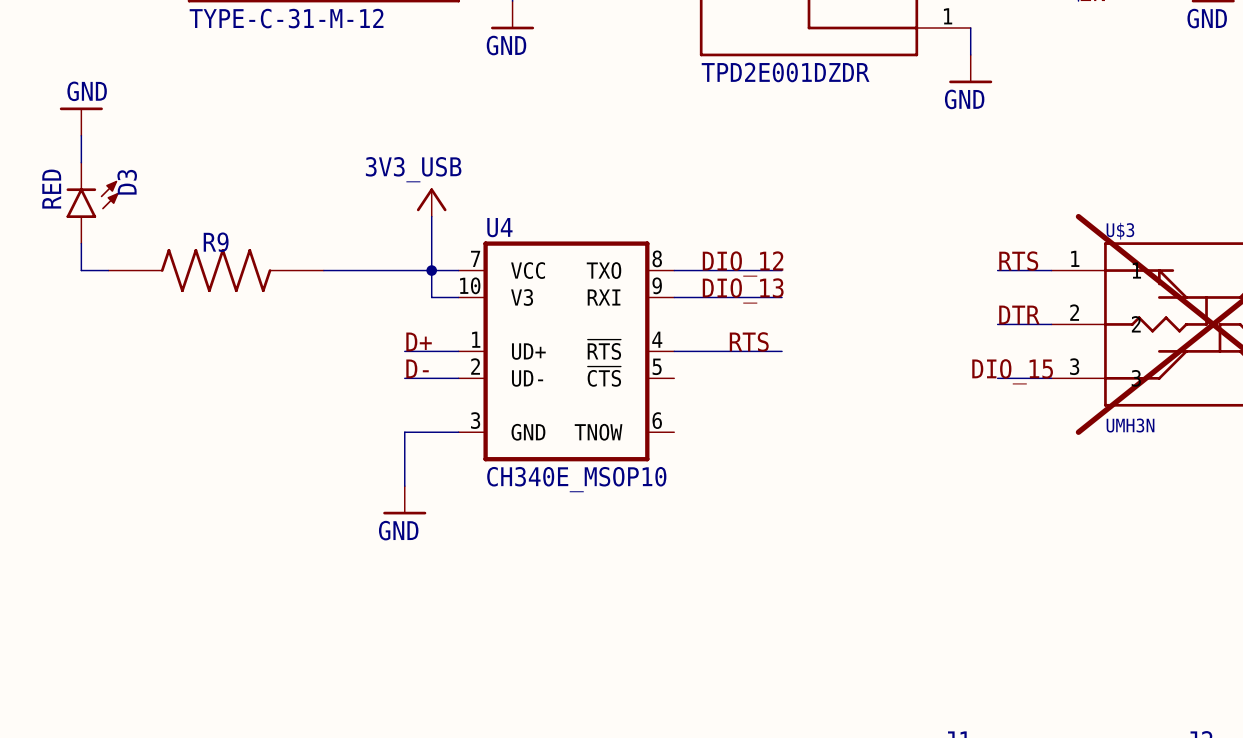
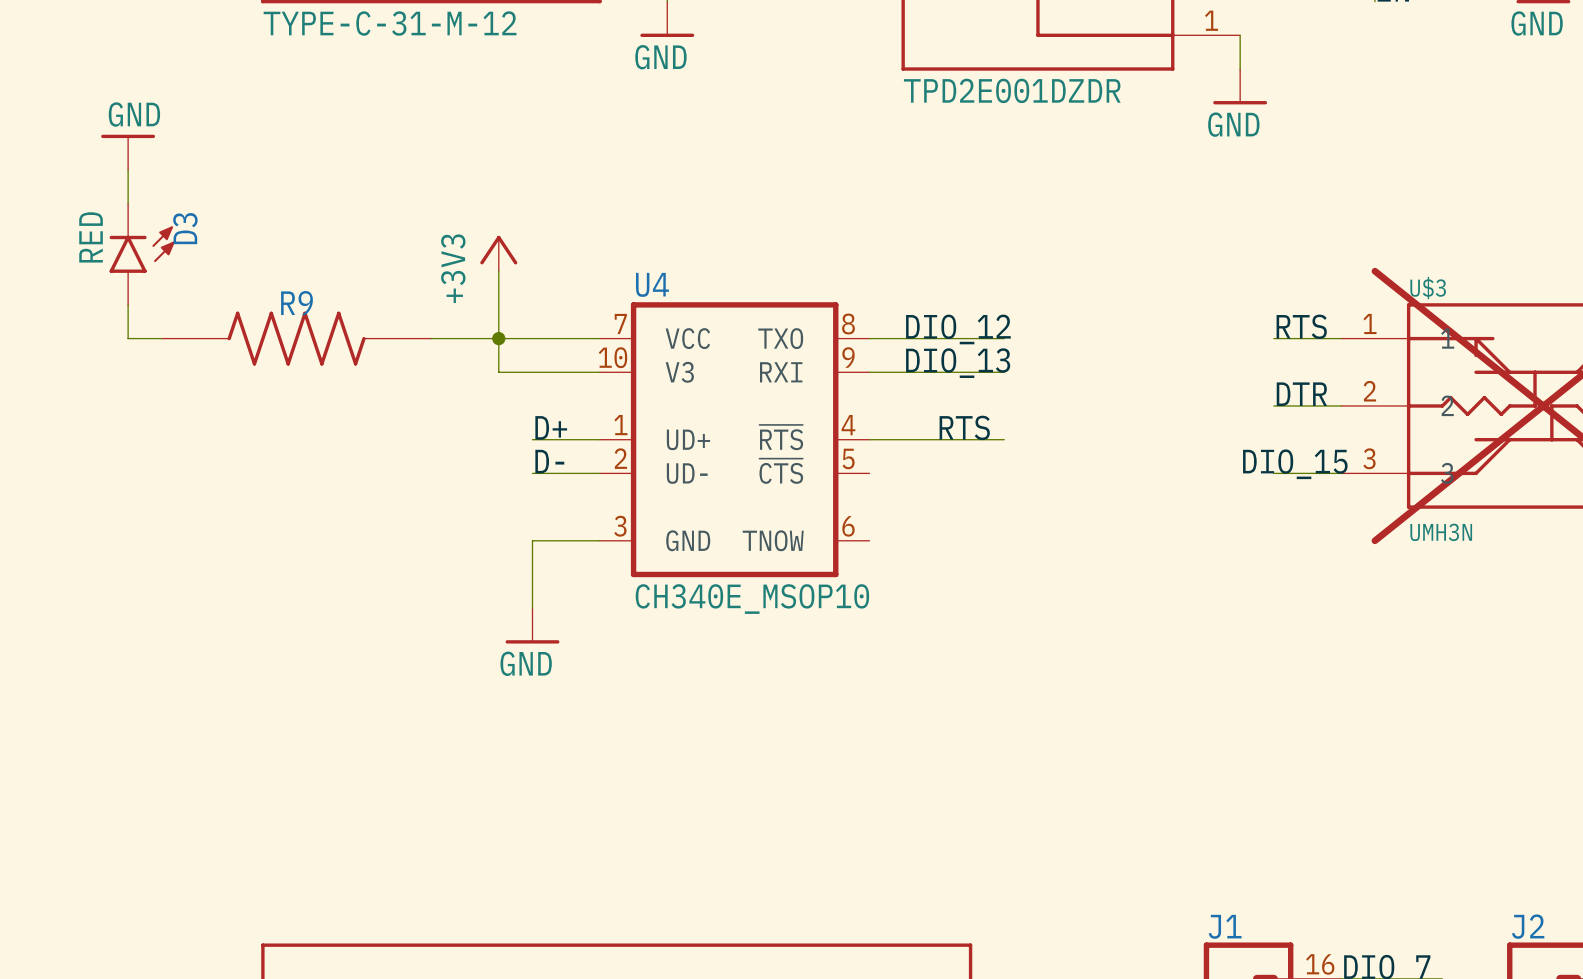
power symbol: none -> +3V3 (498, 253)
power symbol: 3V3_USB (431, 202) -> none
wire: (431, 216) (431, 297) -> (498, 271) (498, 372) (566, 372)
junction position: (431, 270) -> (498, 338)

